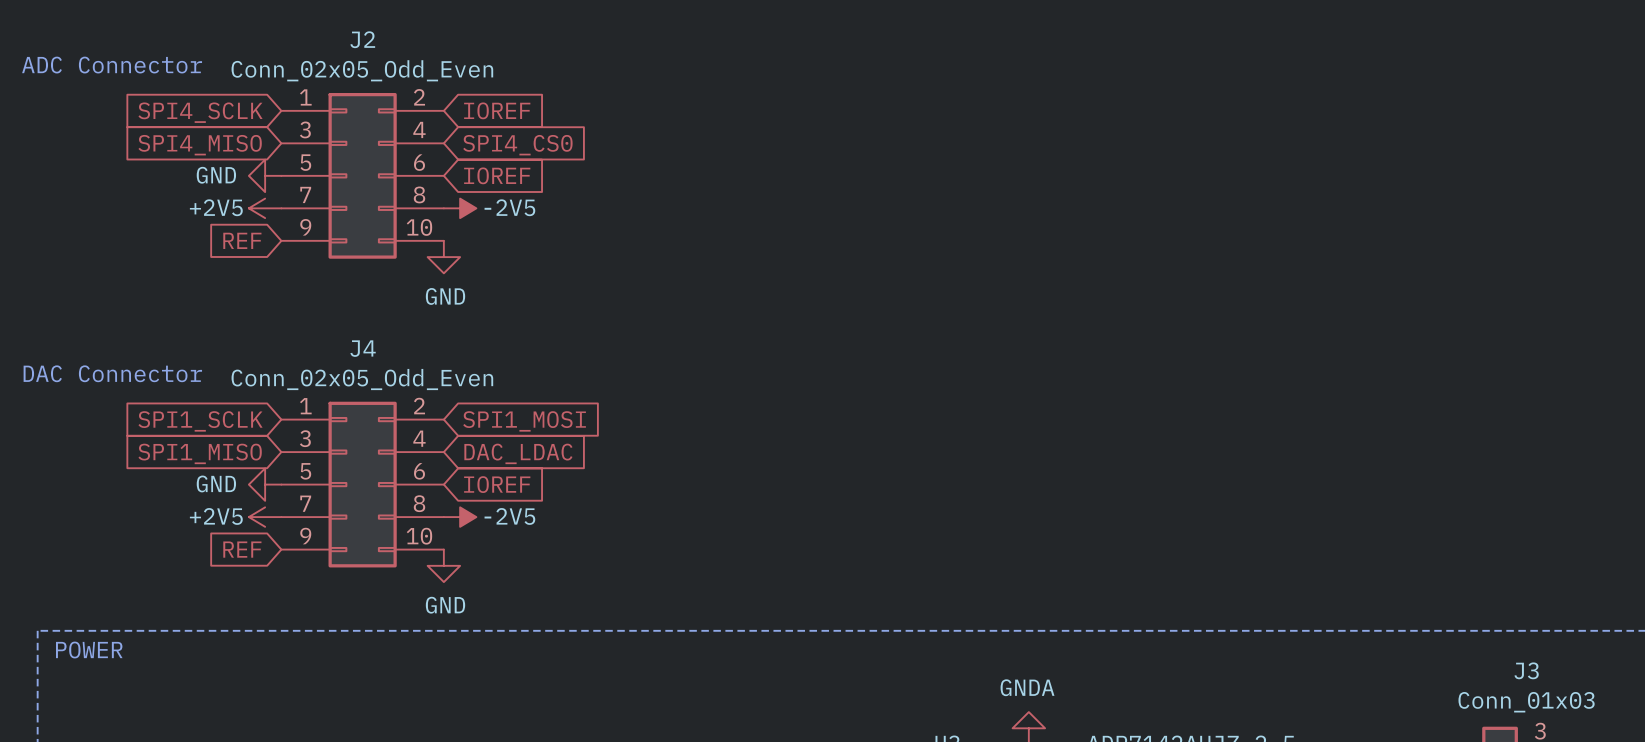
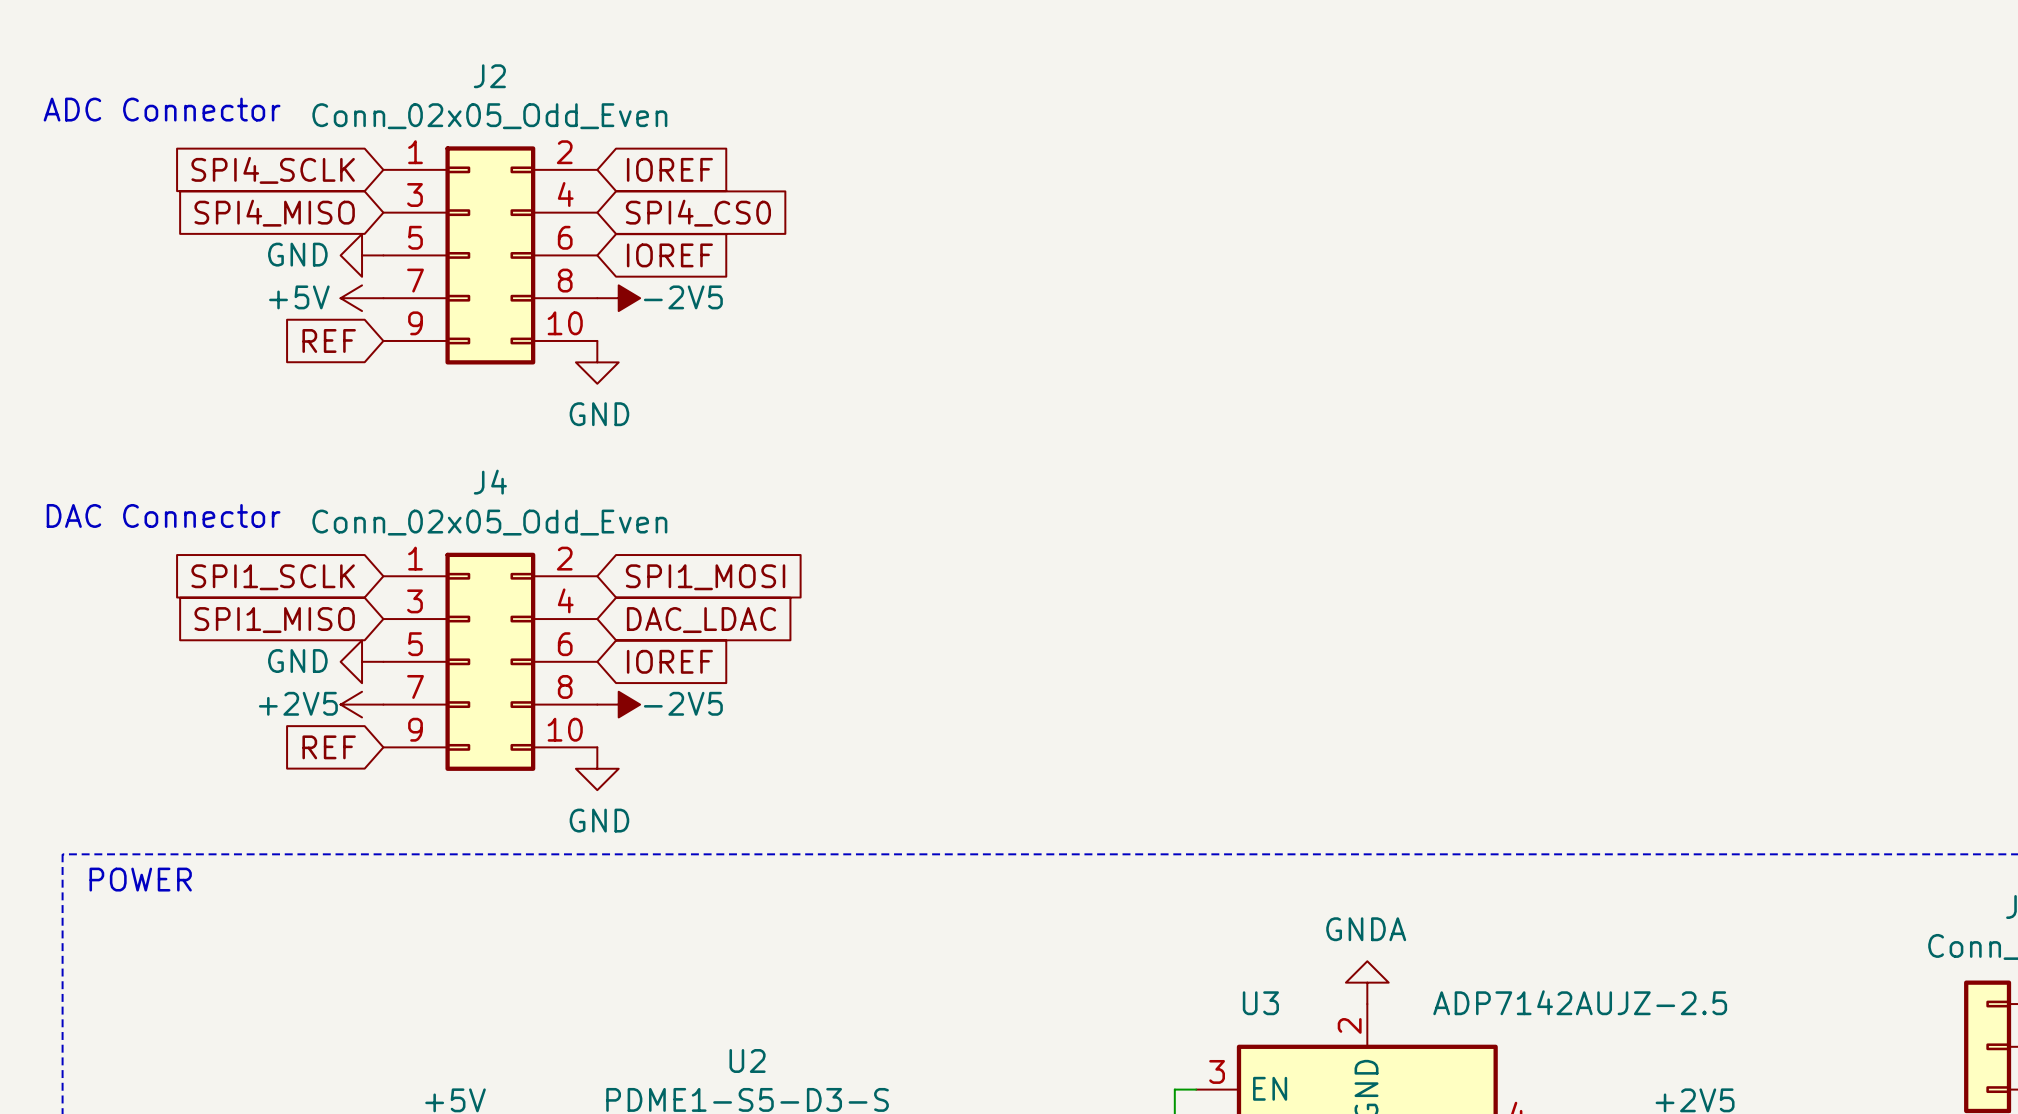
power symbol: +2V5 (265, 208) -> +5V (362, 298)

